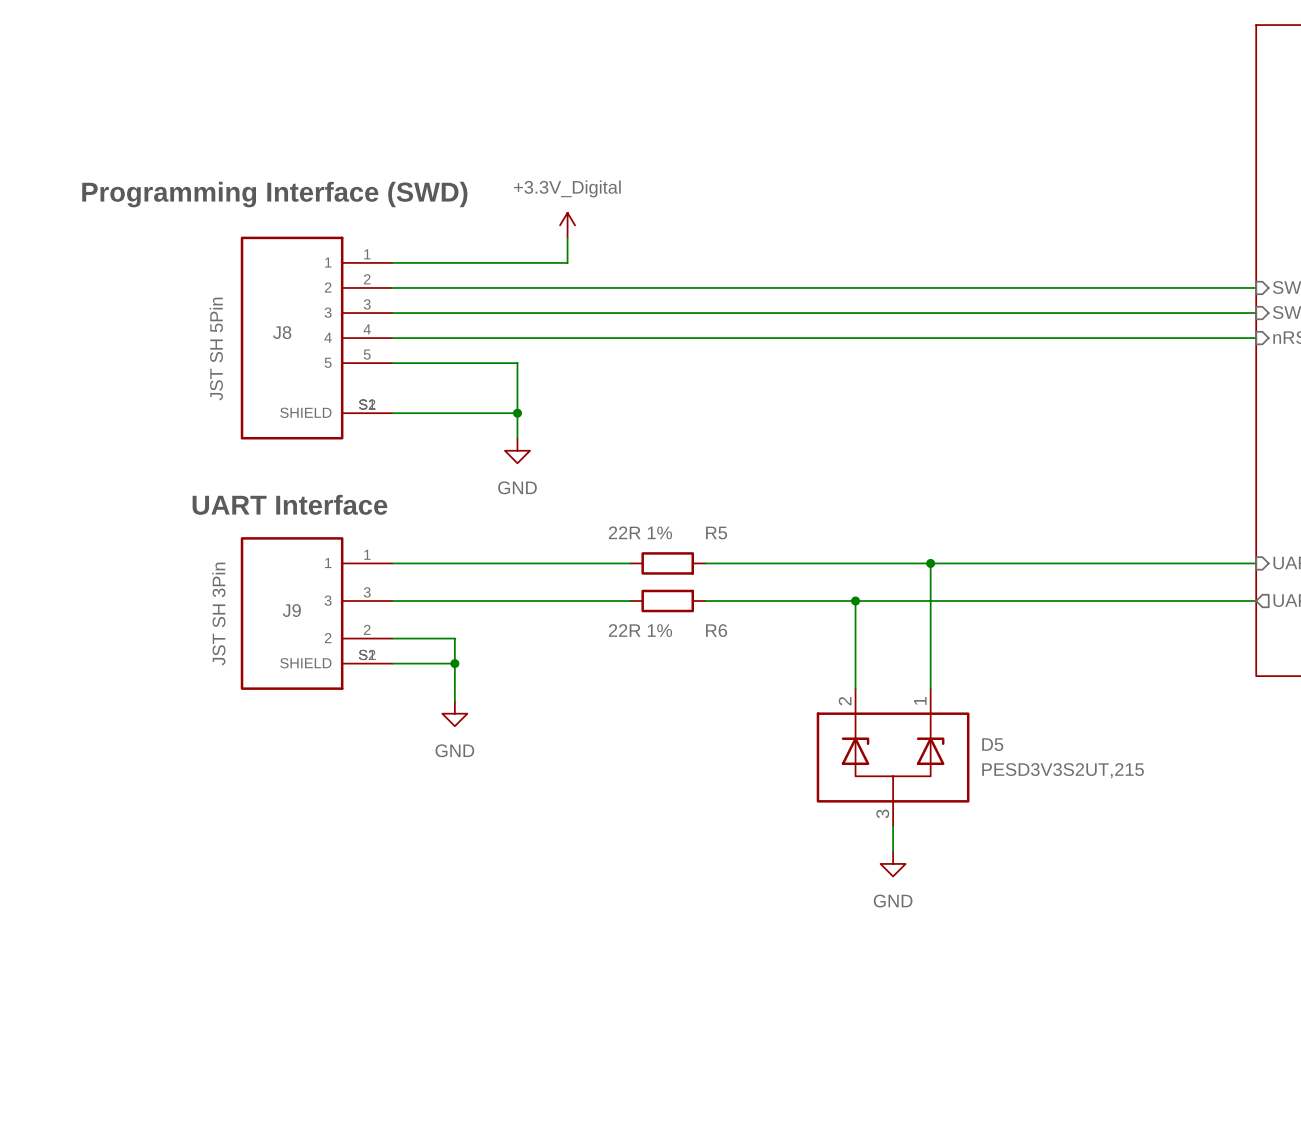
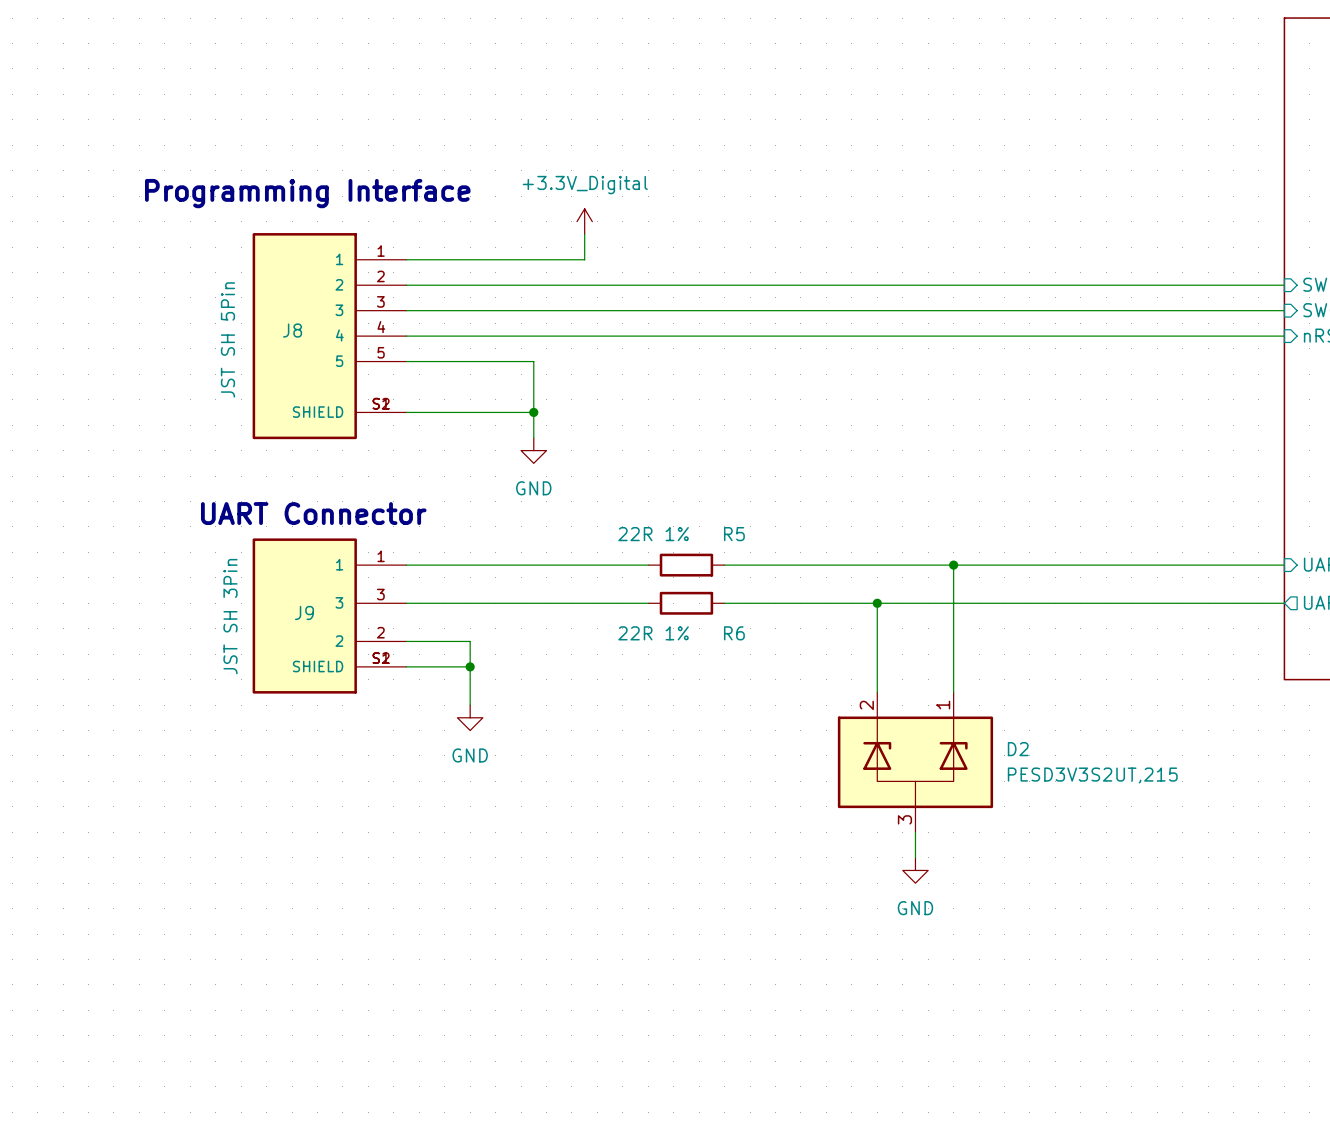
text: Programming Interface (SWD) (274, 194) -> Programming Interface (307, 193)
text: UART Interface (289, 504) -> none
text: none -> UART Connector (313, 513)
D5 name: D5 (992, 744) -> D2 (1018, 749)

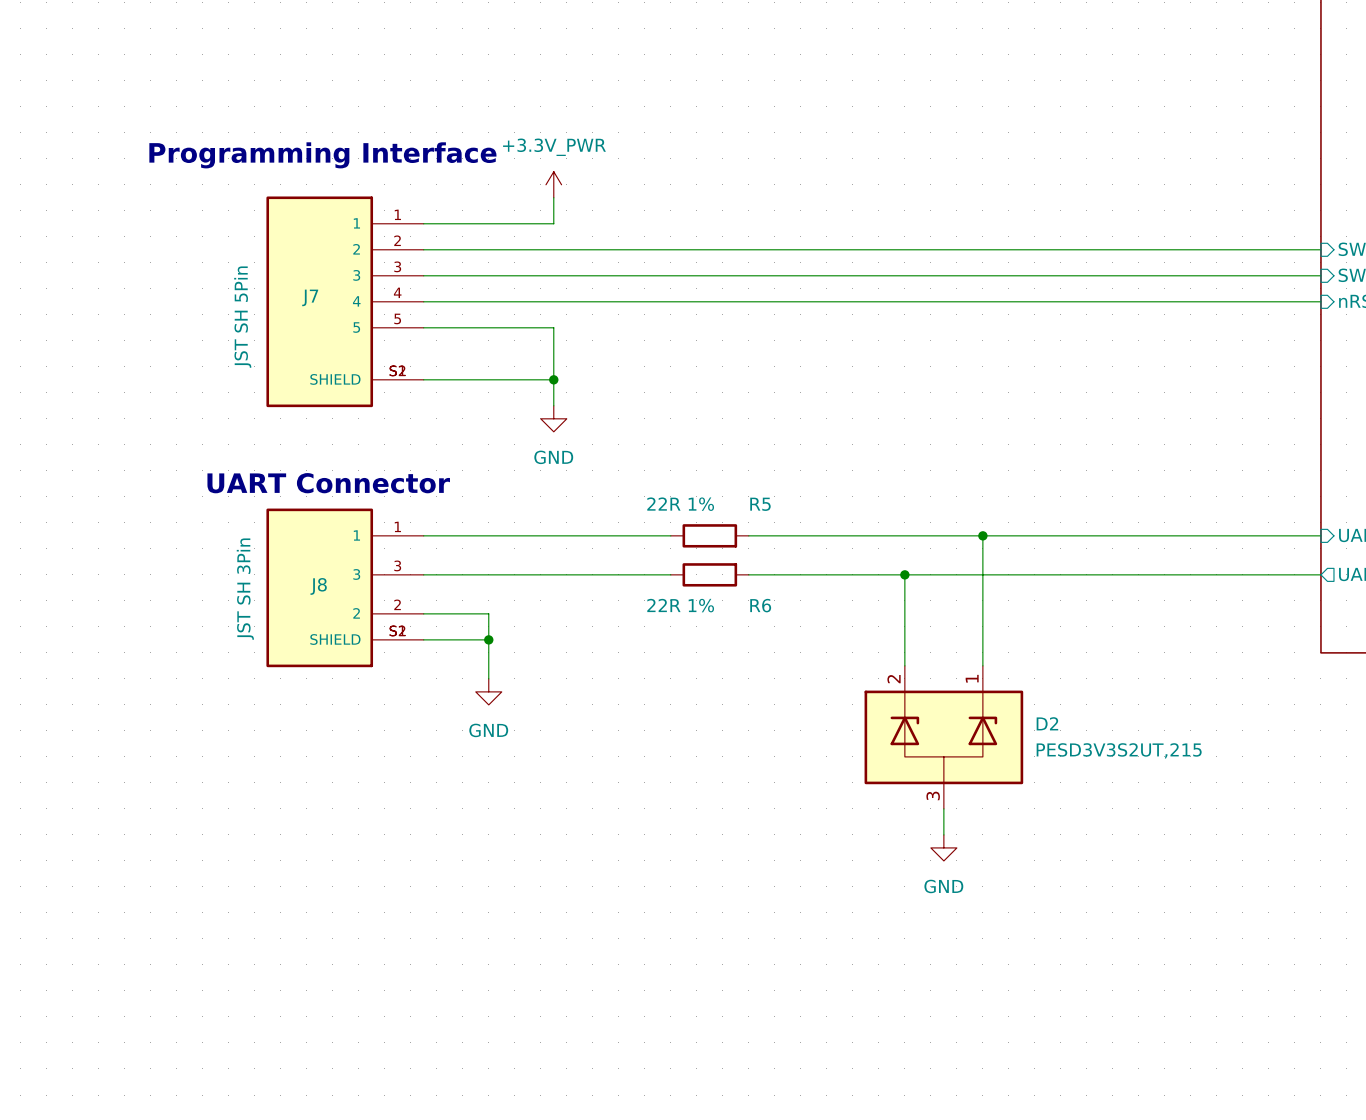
power symbol: none -> +3.3V_PWR (553, 184)
power symbol: +3.3V_Digital (584, 221) -> none
wire: (584, 234) (584, 259) (533, 259) -> (553, 197) (553, 223)
J8 name: J8 (292, 330) -> J7 (310, 297)
J9 name: J9 (304, 612) -> J8 (318, 586)

